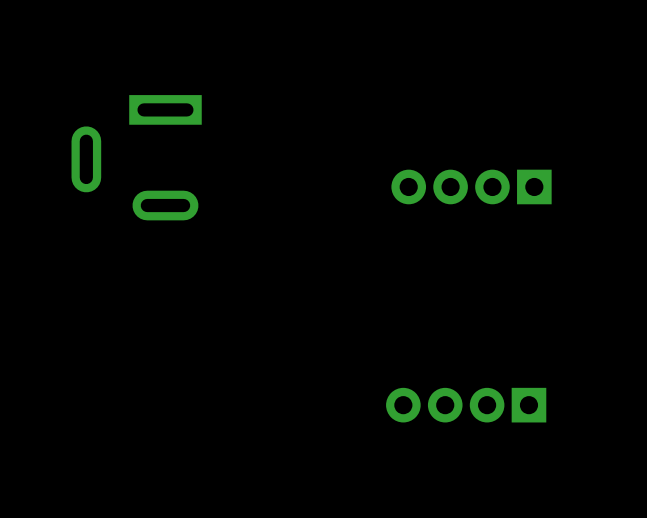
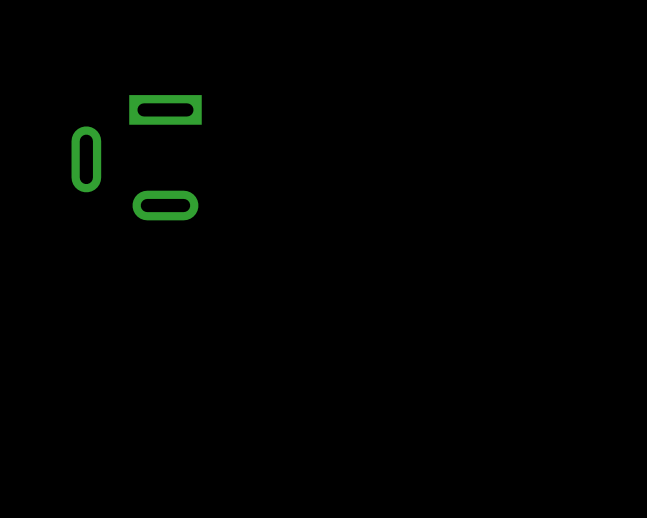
part: (471, 186) -> none
part: (466, 405) -> none

